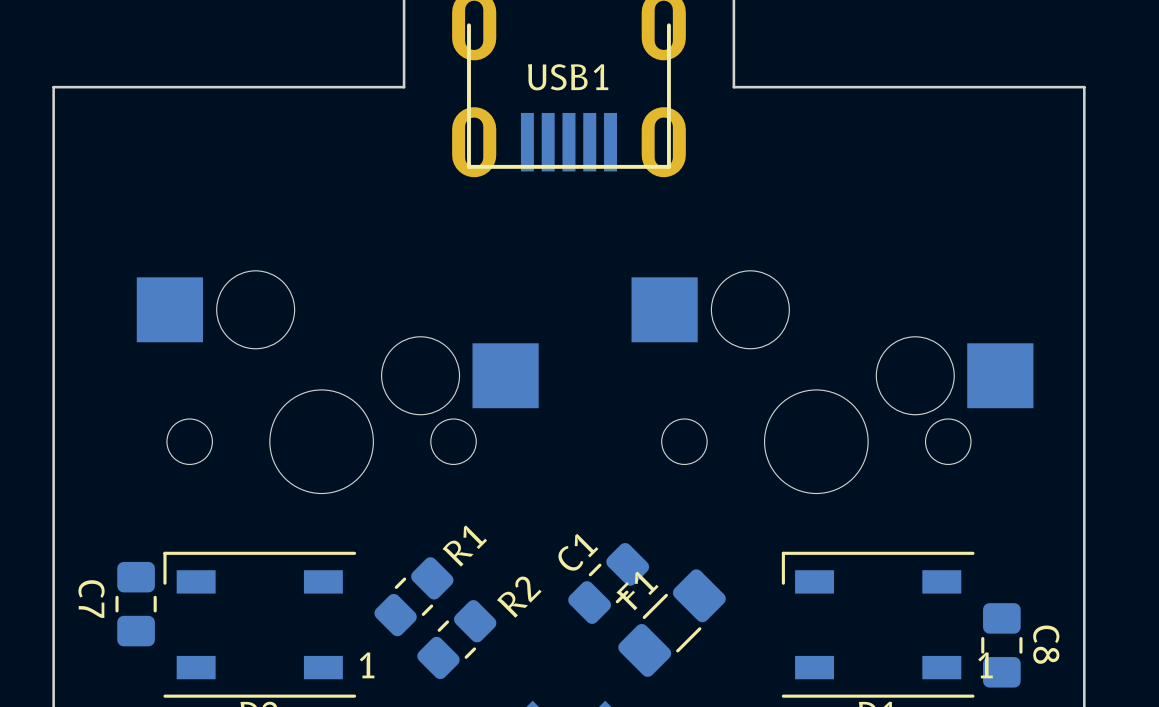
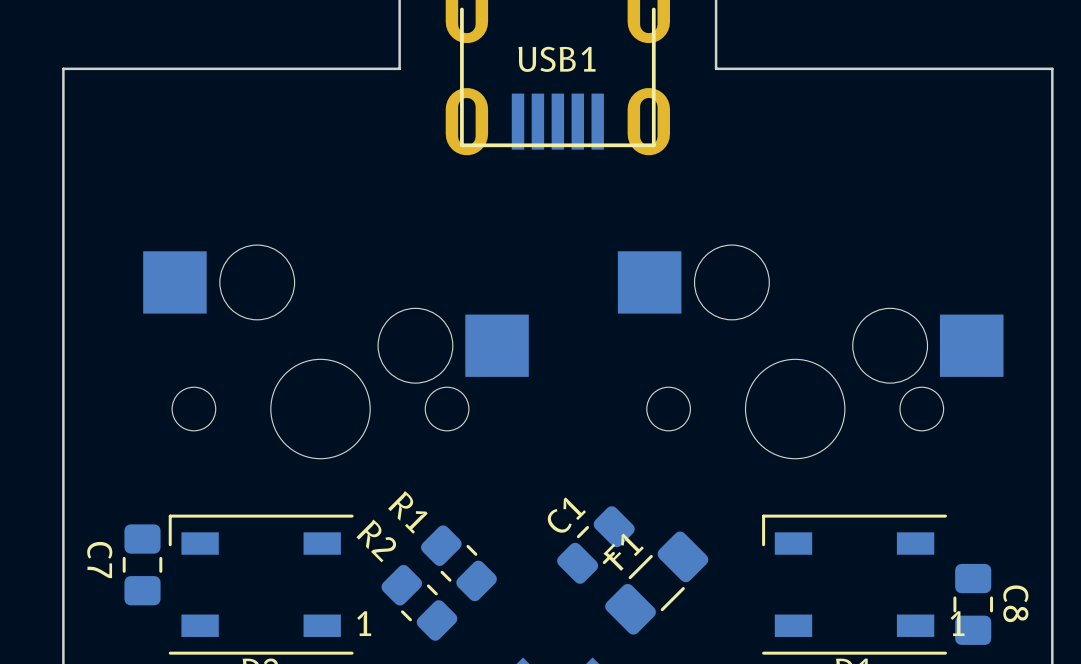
R1 name position: R1 (464, 546) -> R1 (407, 512)
R1 rotation: 0° (413, 596) -> 90° clockwise (458, 563)
R1 position: (413, 596) -> (458, 563)
R2 name position: R2 (519, 597) -> R2 (376, 540)
R2 rotation: 0° (456, 639) -> 90° clockwise (419, 602)

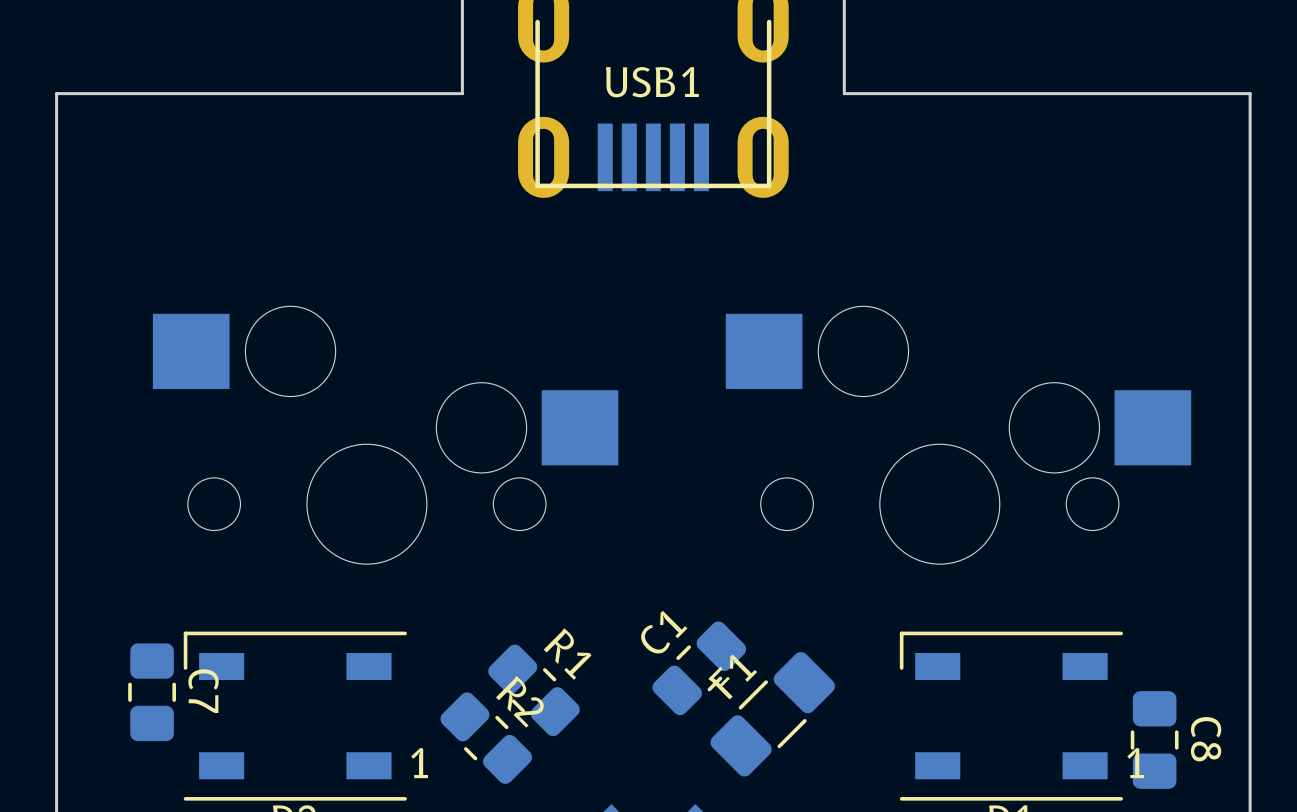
R1 name position: R1 (407, 512) -> R1 (567, 654)
R2 name position: R2 (376, 540) -> R2 (519, 701)
C7 name position: C7 (99, 560) -> C7 (203, 691)

